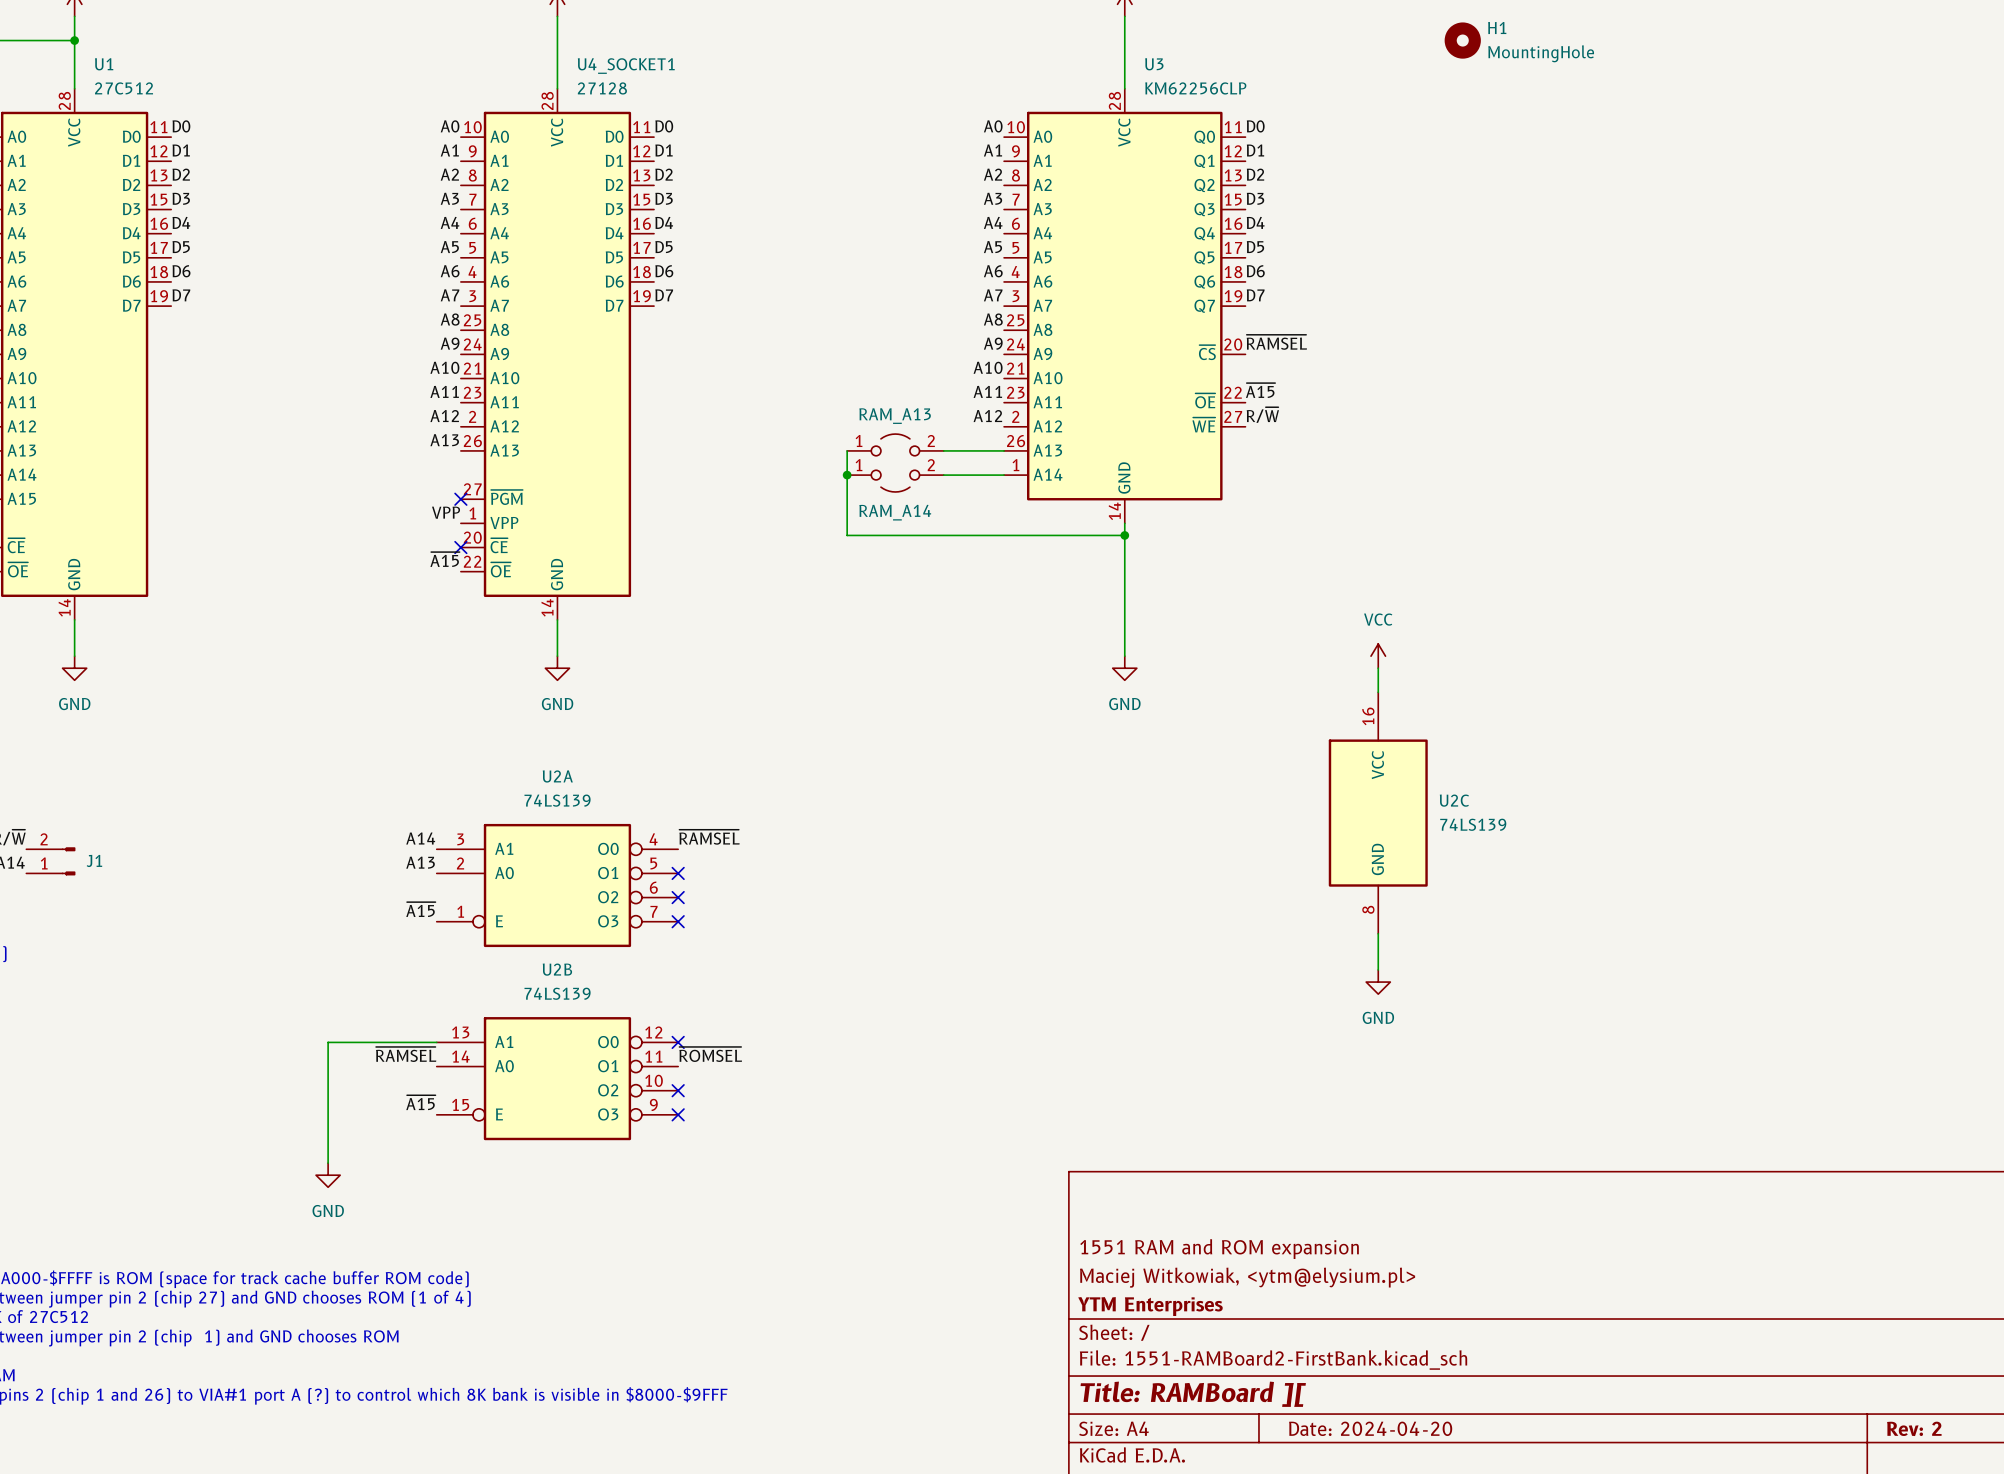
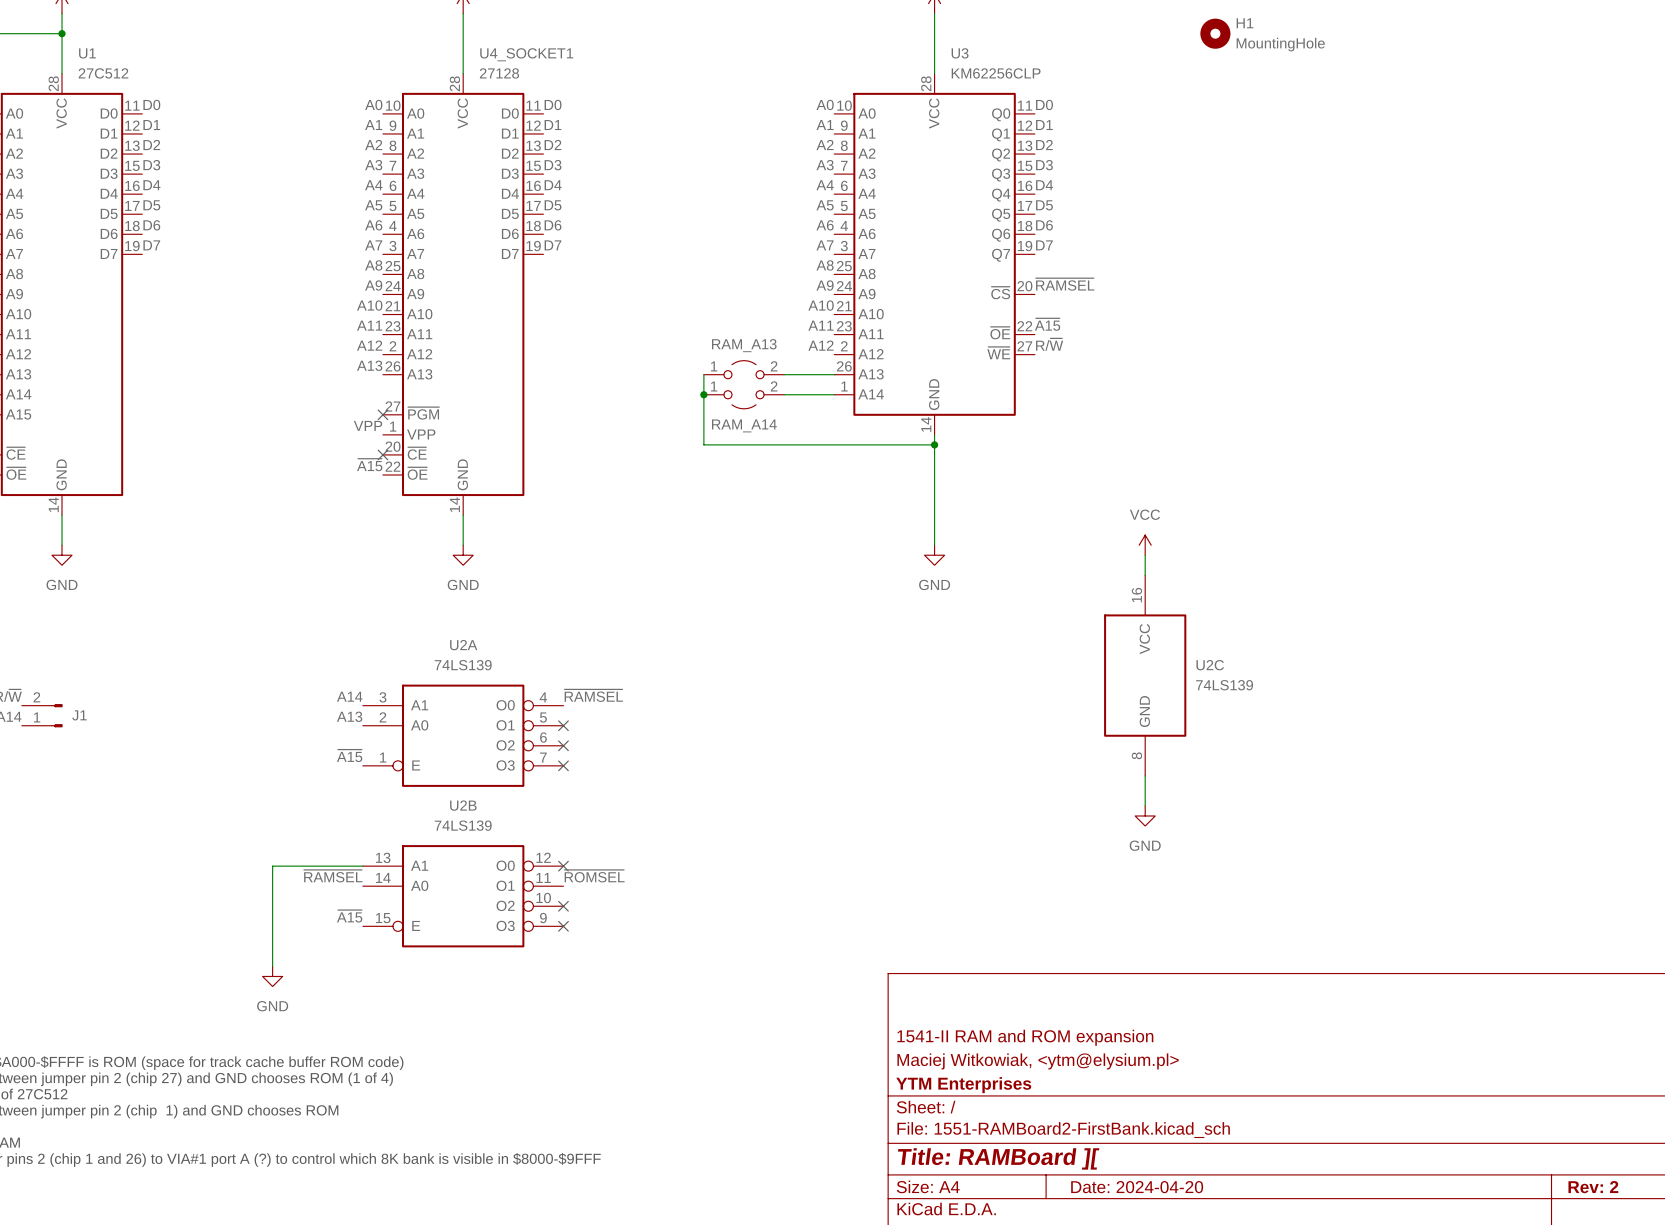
title block: 1551 RAM and ROM expansion (1219, 1249) -> 1541-II RAM and ROM expansion (1025, 1037)

